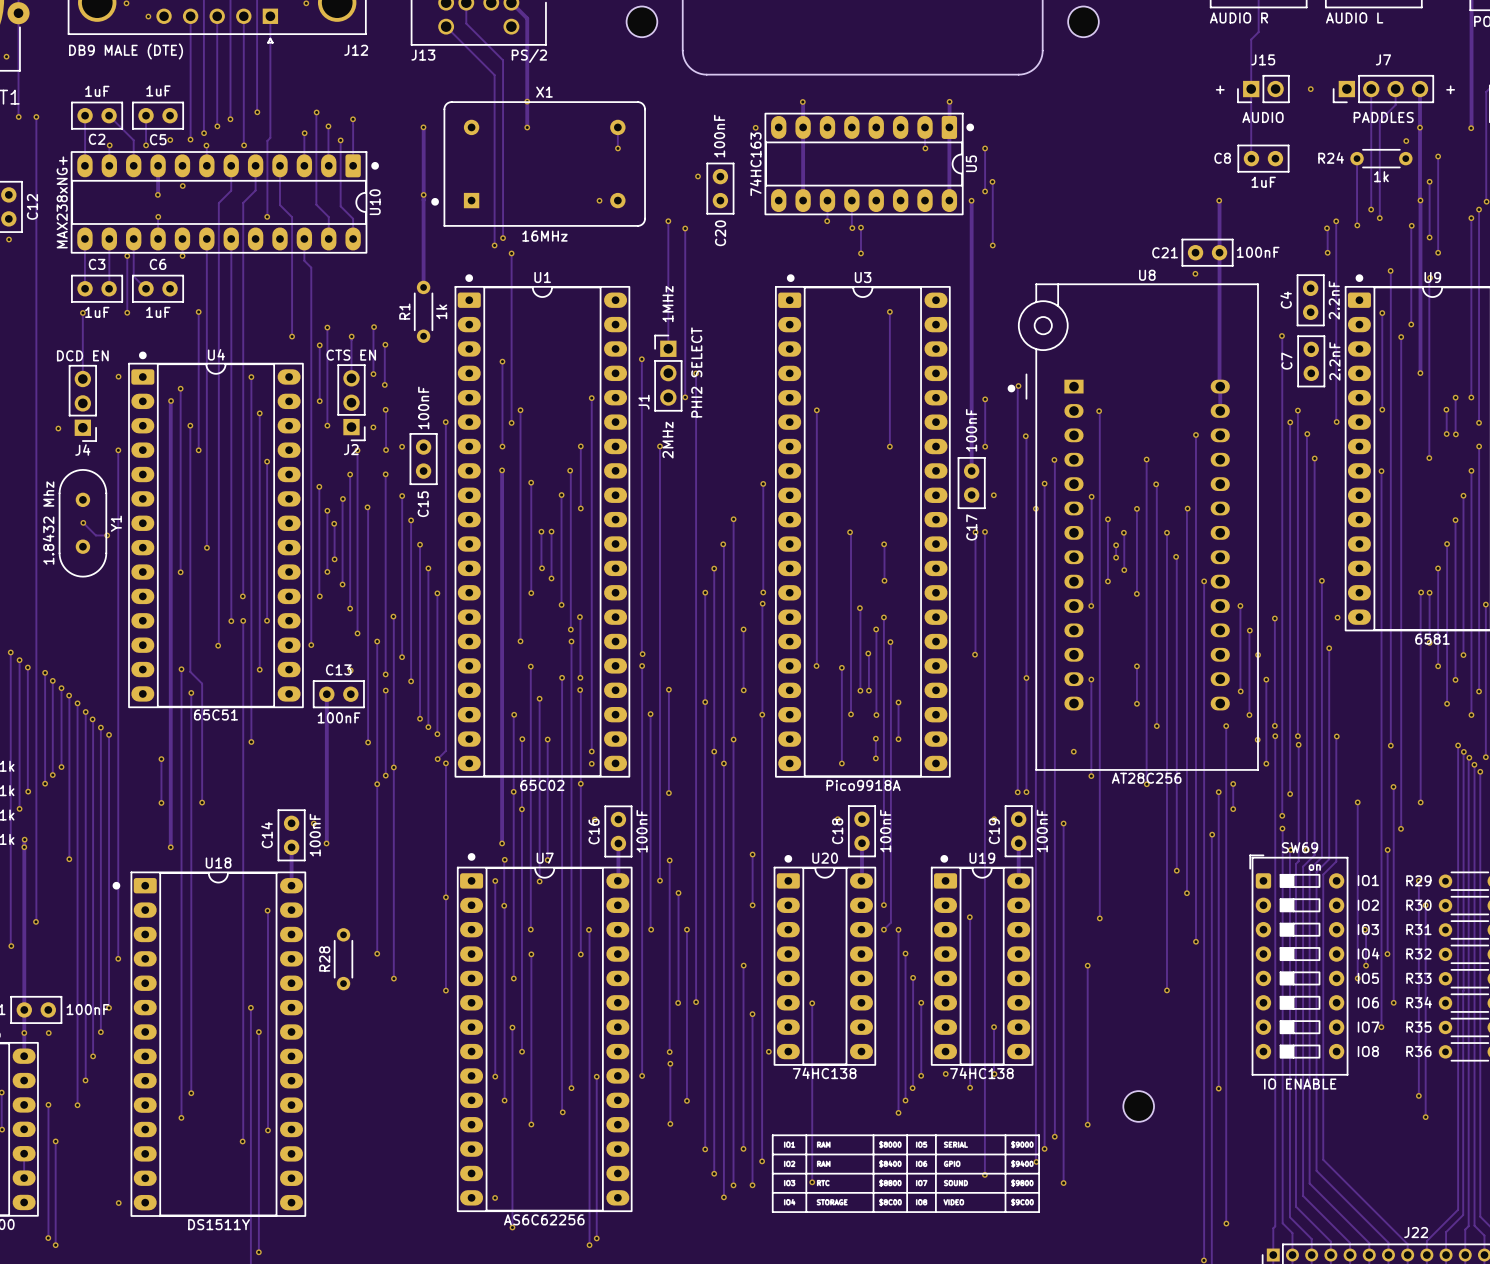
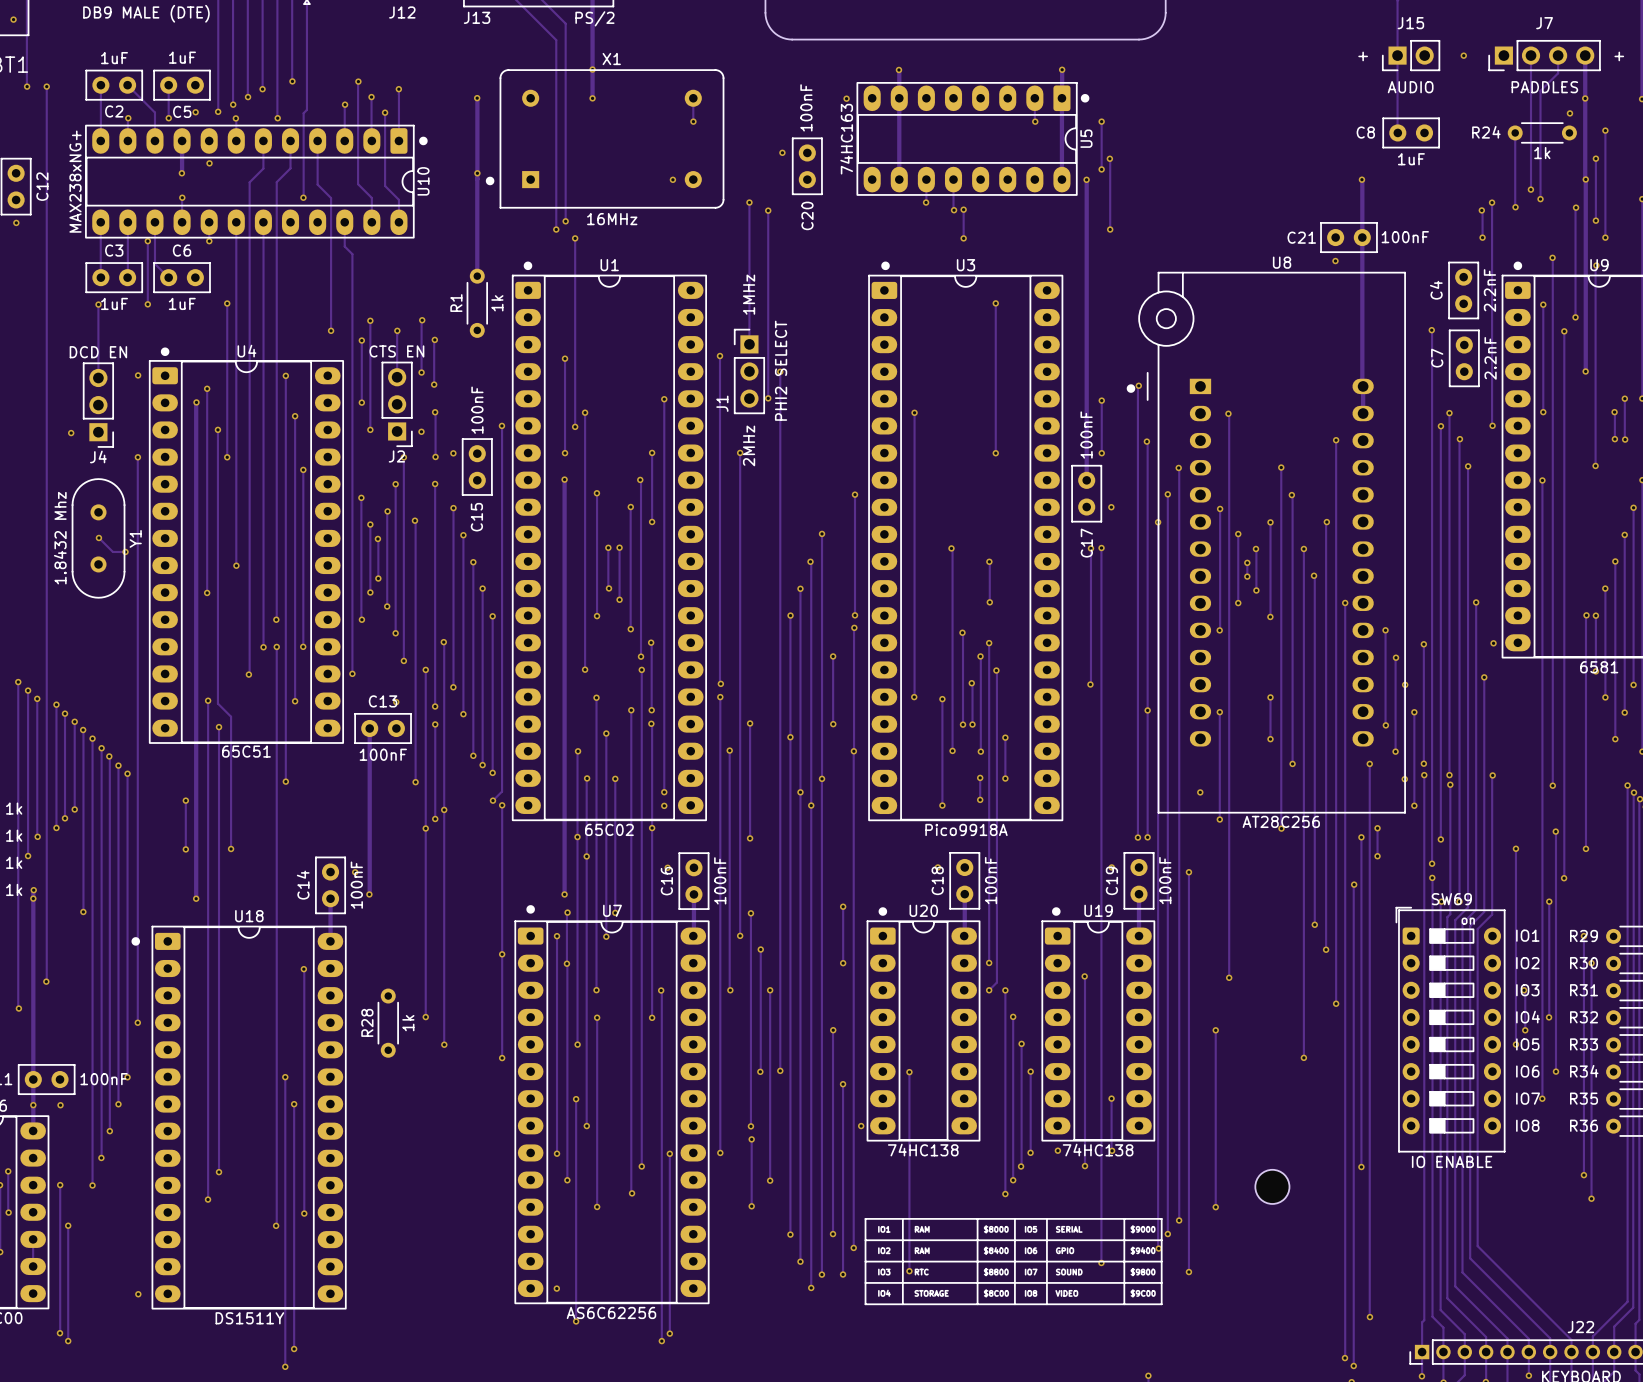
R28 value: none -> 1k (408, 1023)

